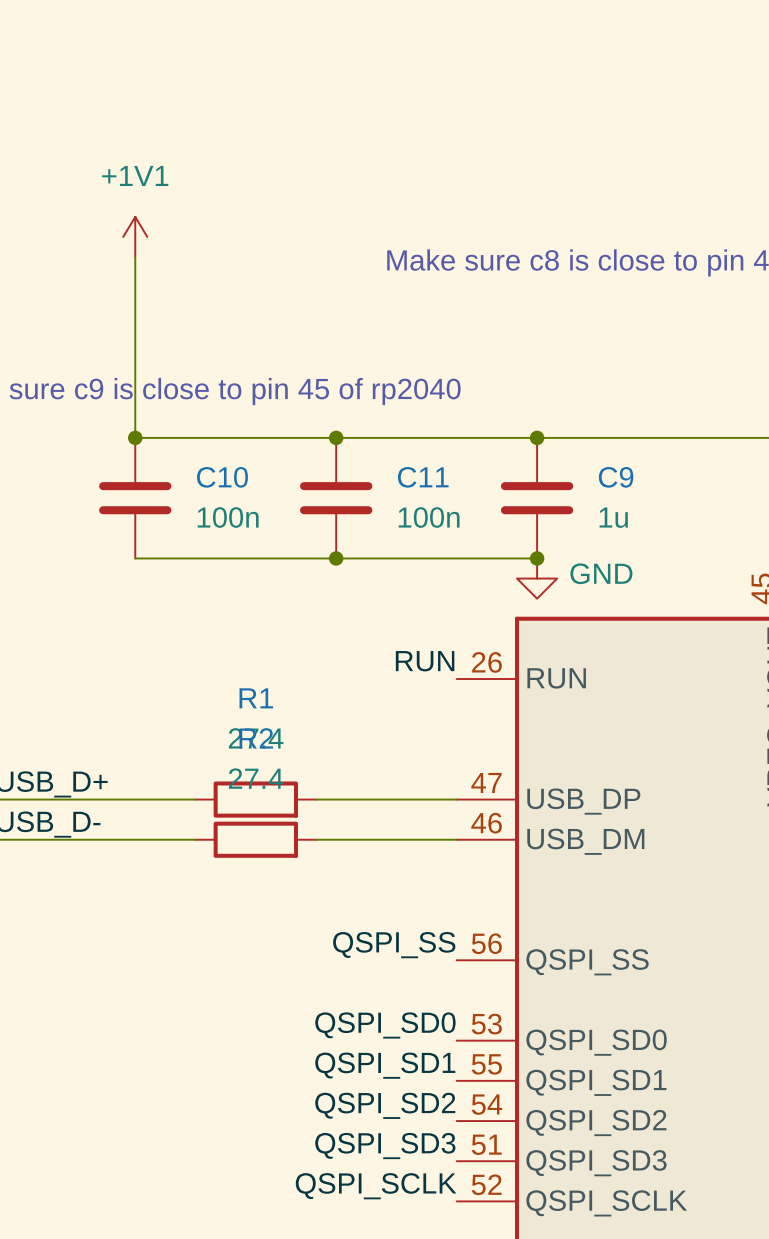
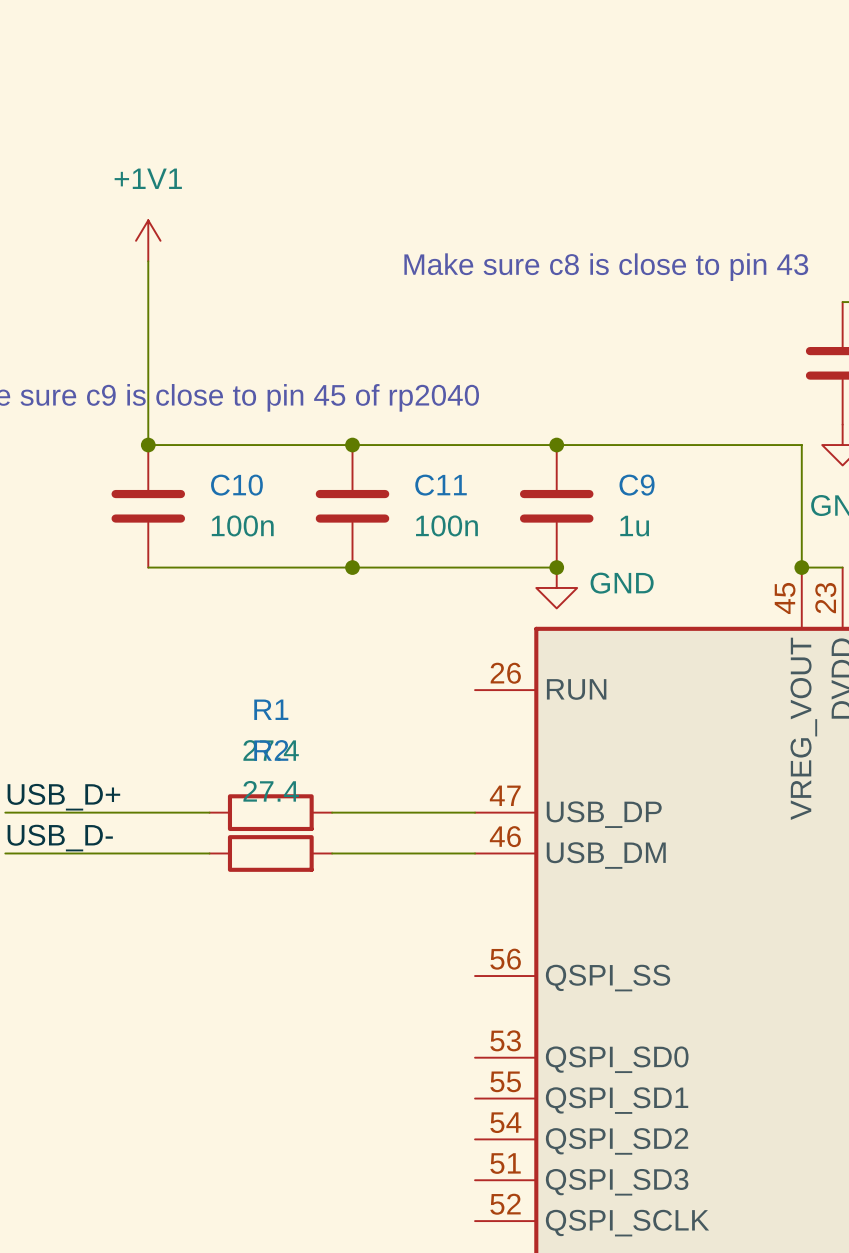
label: RUN (425, 661) -> none
label: QSPI_SS (394, 945) -> none
label: QSPI_SD0 (385, 1025) -> none
label: QSPI_SD1 (385, 1065) -> none
label: QSPI_SD2 (385, 1105) -> none
label: QSPI_SD3 (385, 1146) -> none
label: QSPI_SCLK (376, 1186) -> none

